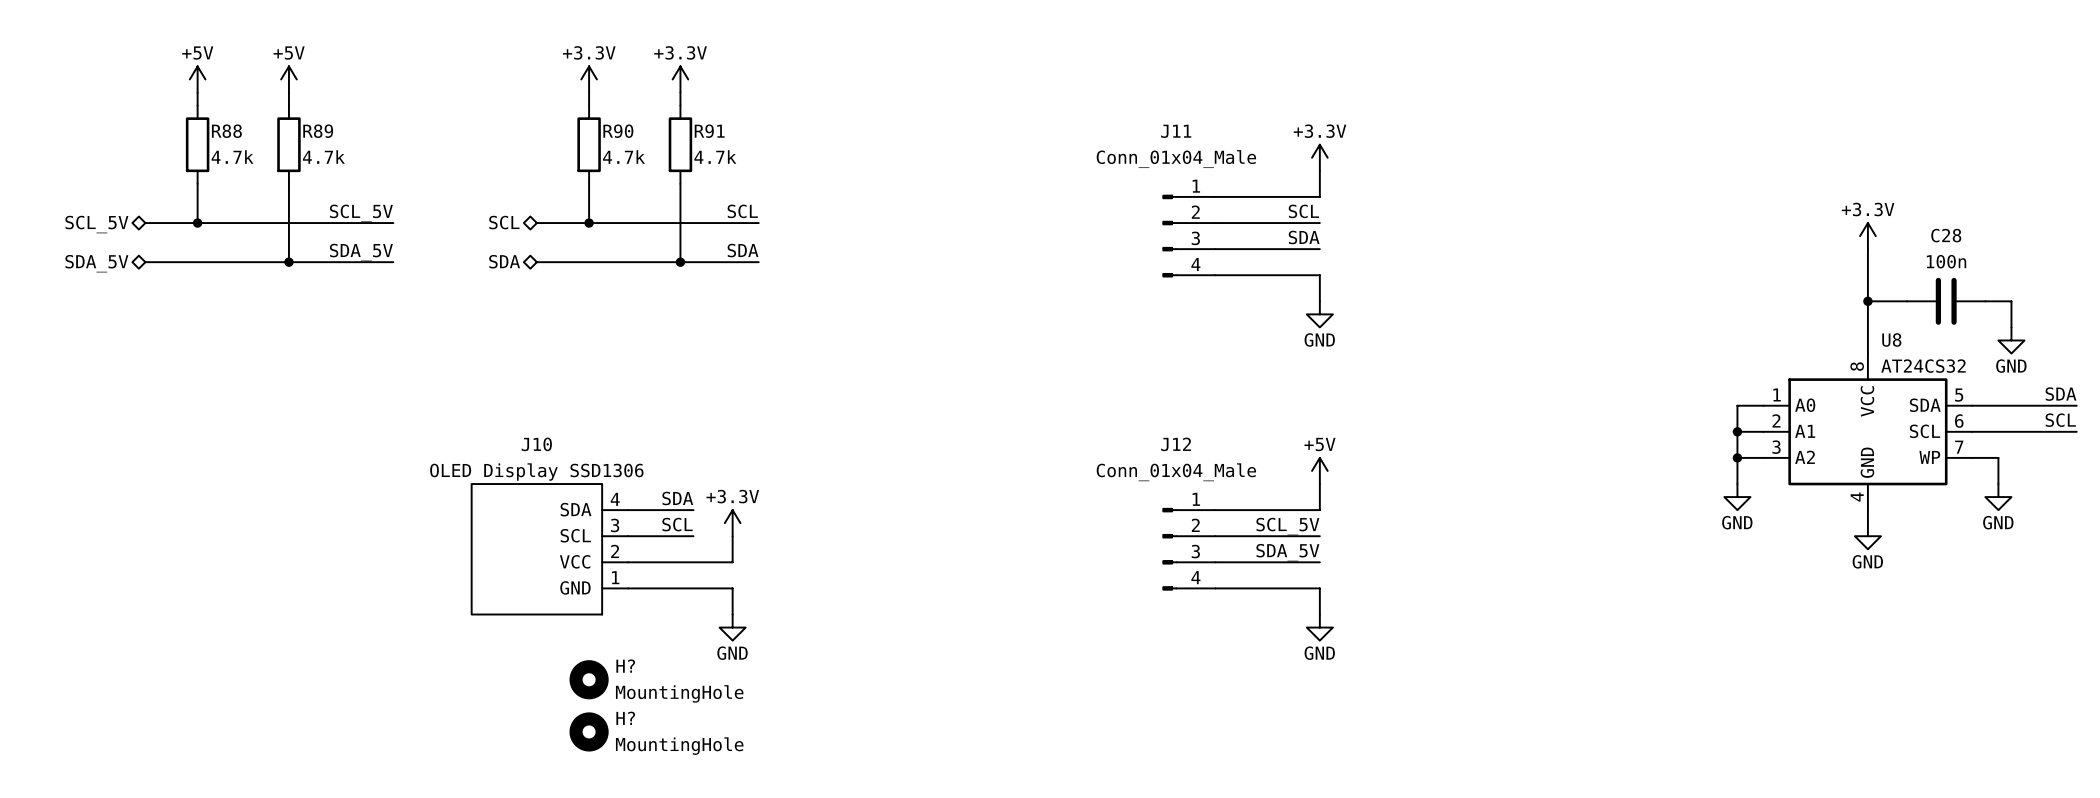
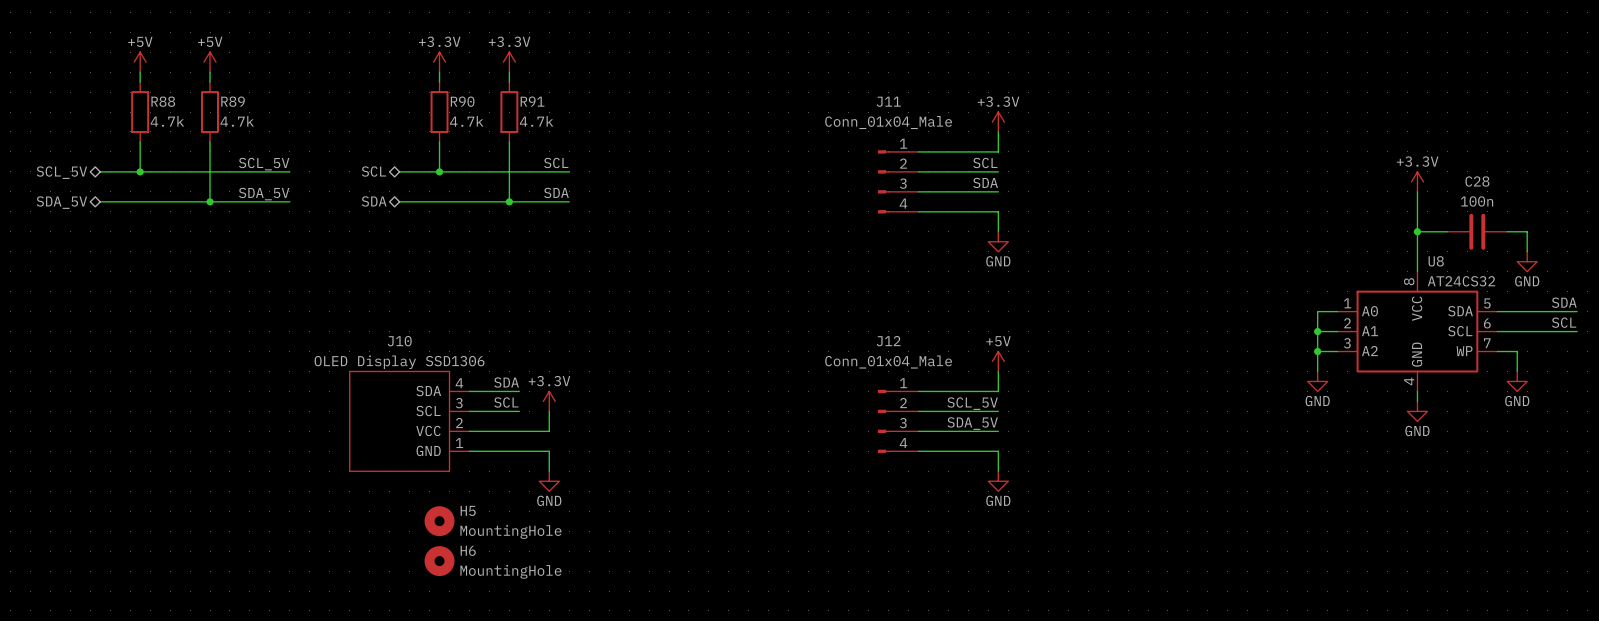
H? name: H? (625, 666) -> H5 (468, 510)
H? name: H? (625, 718) -> H6 (468, 550)

